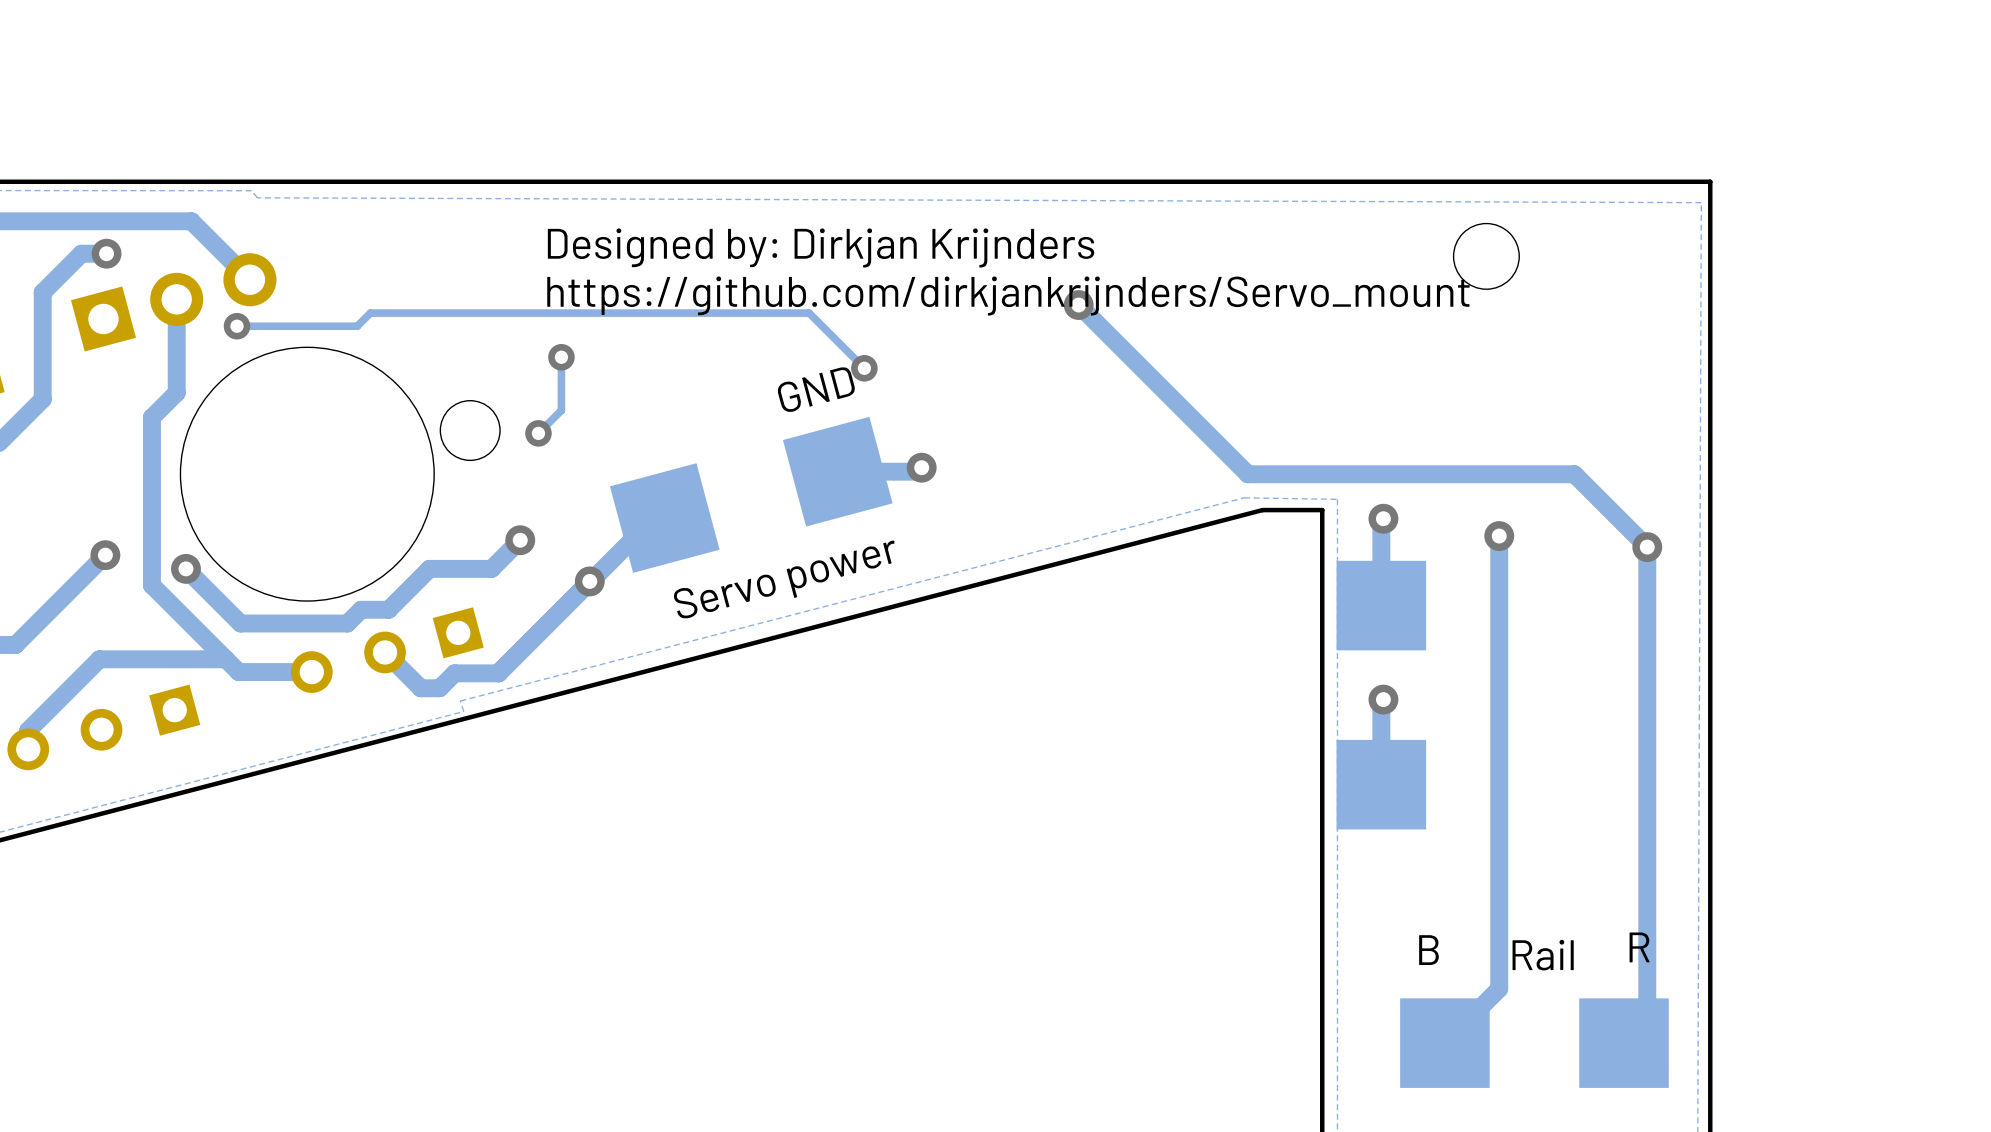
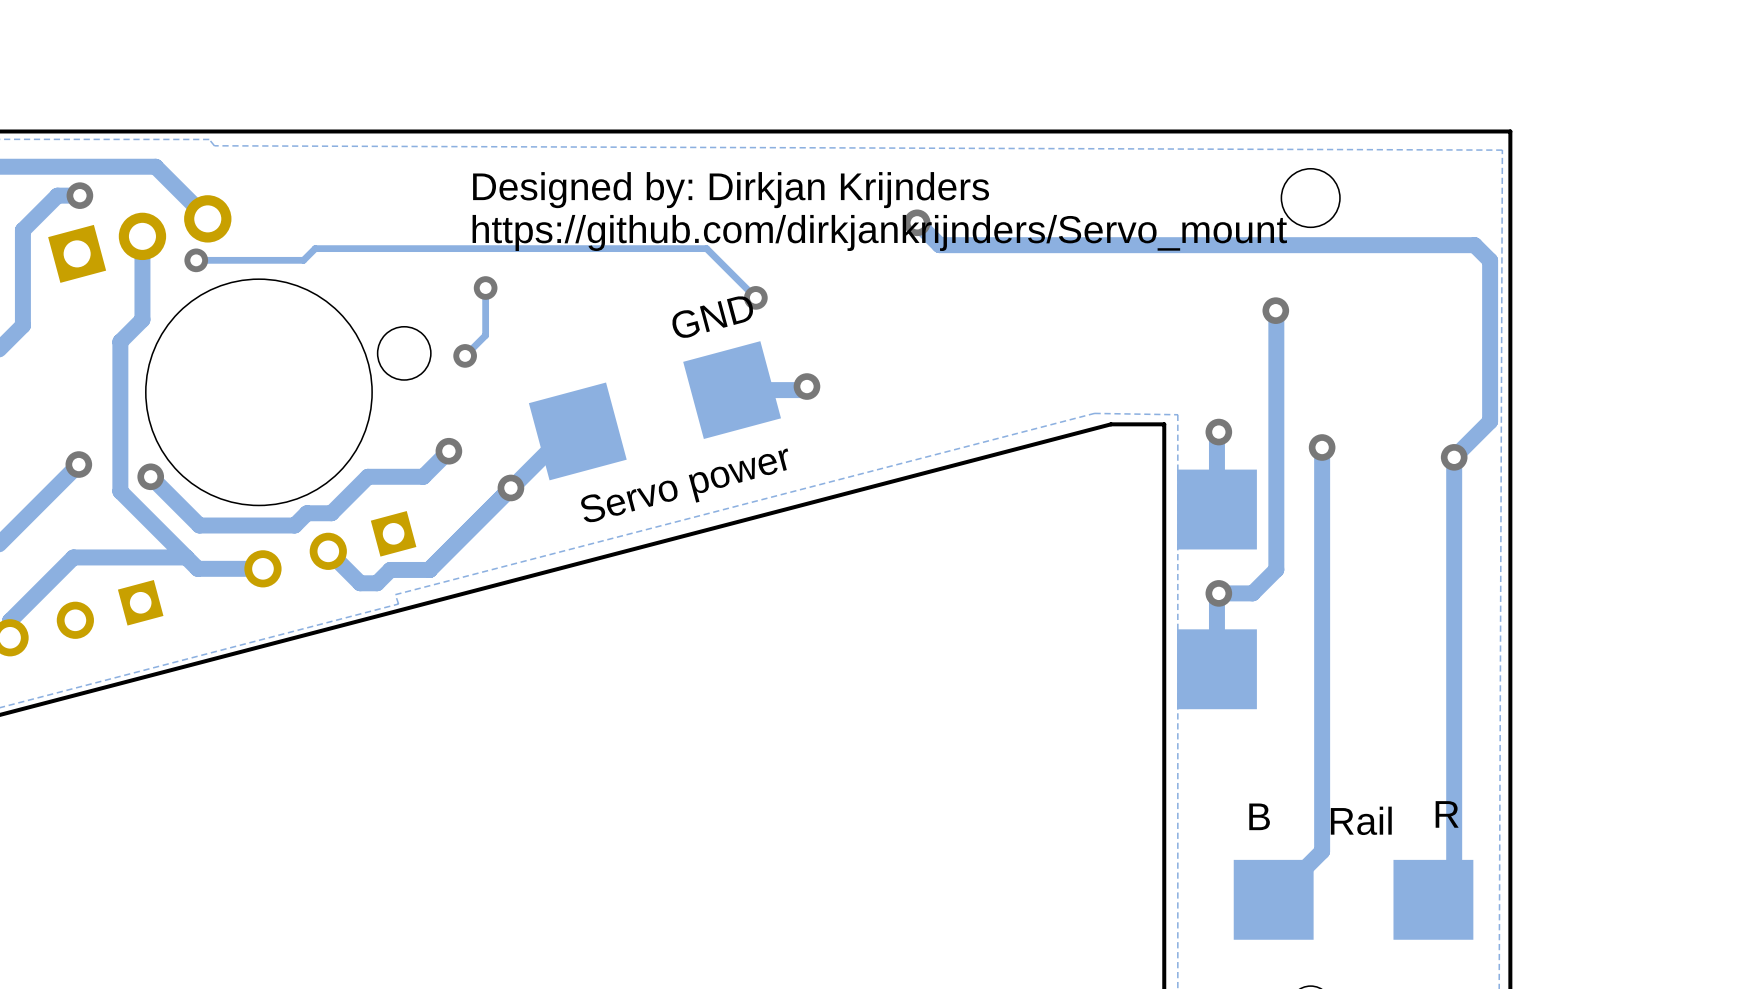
track: (1078, 305) (1247, 474) (1574, 474) (1647, 547) -> (917, 222) (939, 245) (1474, 245) (1490, 260) (1490, 421) (1454, 457)
via position: (1078, 305) -> (917, 222)
track: none -> (1275, 310) (1276, 569) (1252, 593) (1218, 593)
via: none -> (1275, 310)

